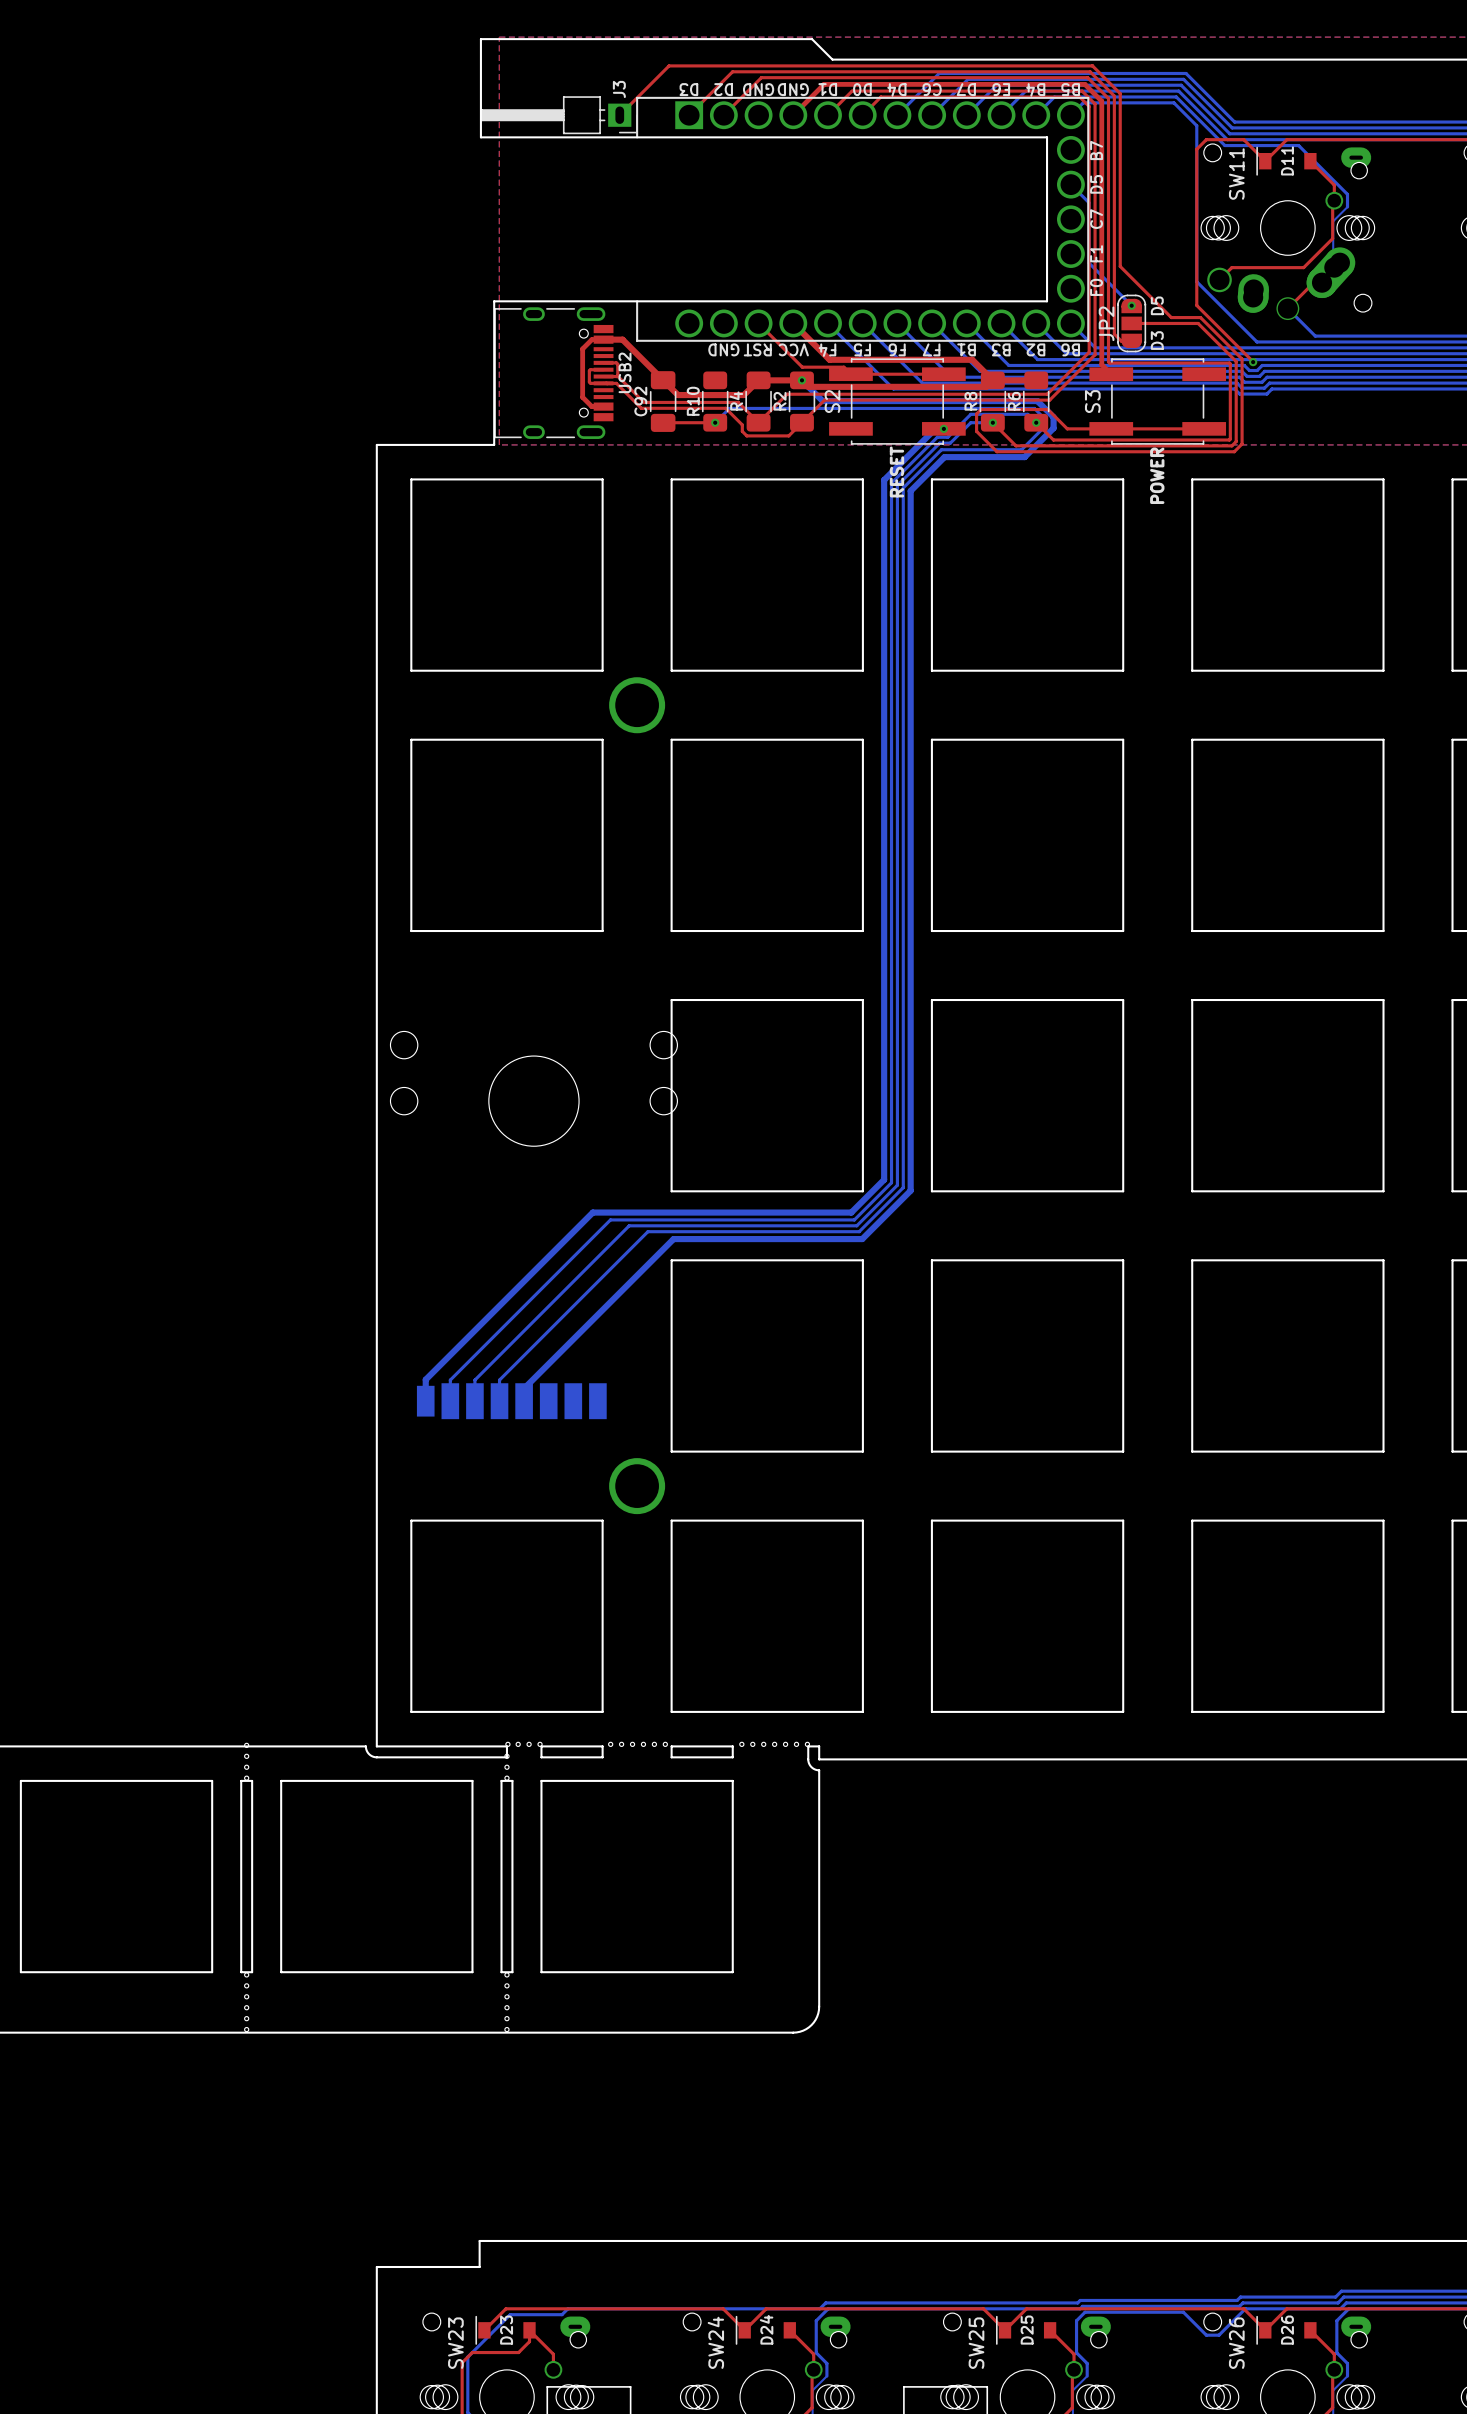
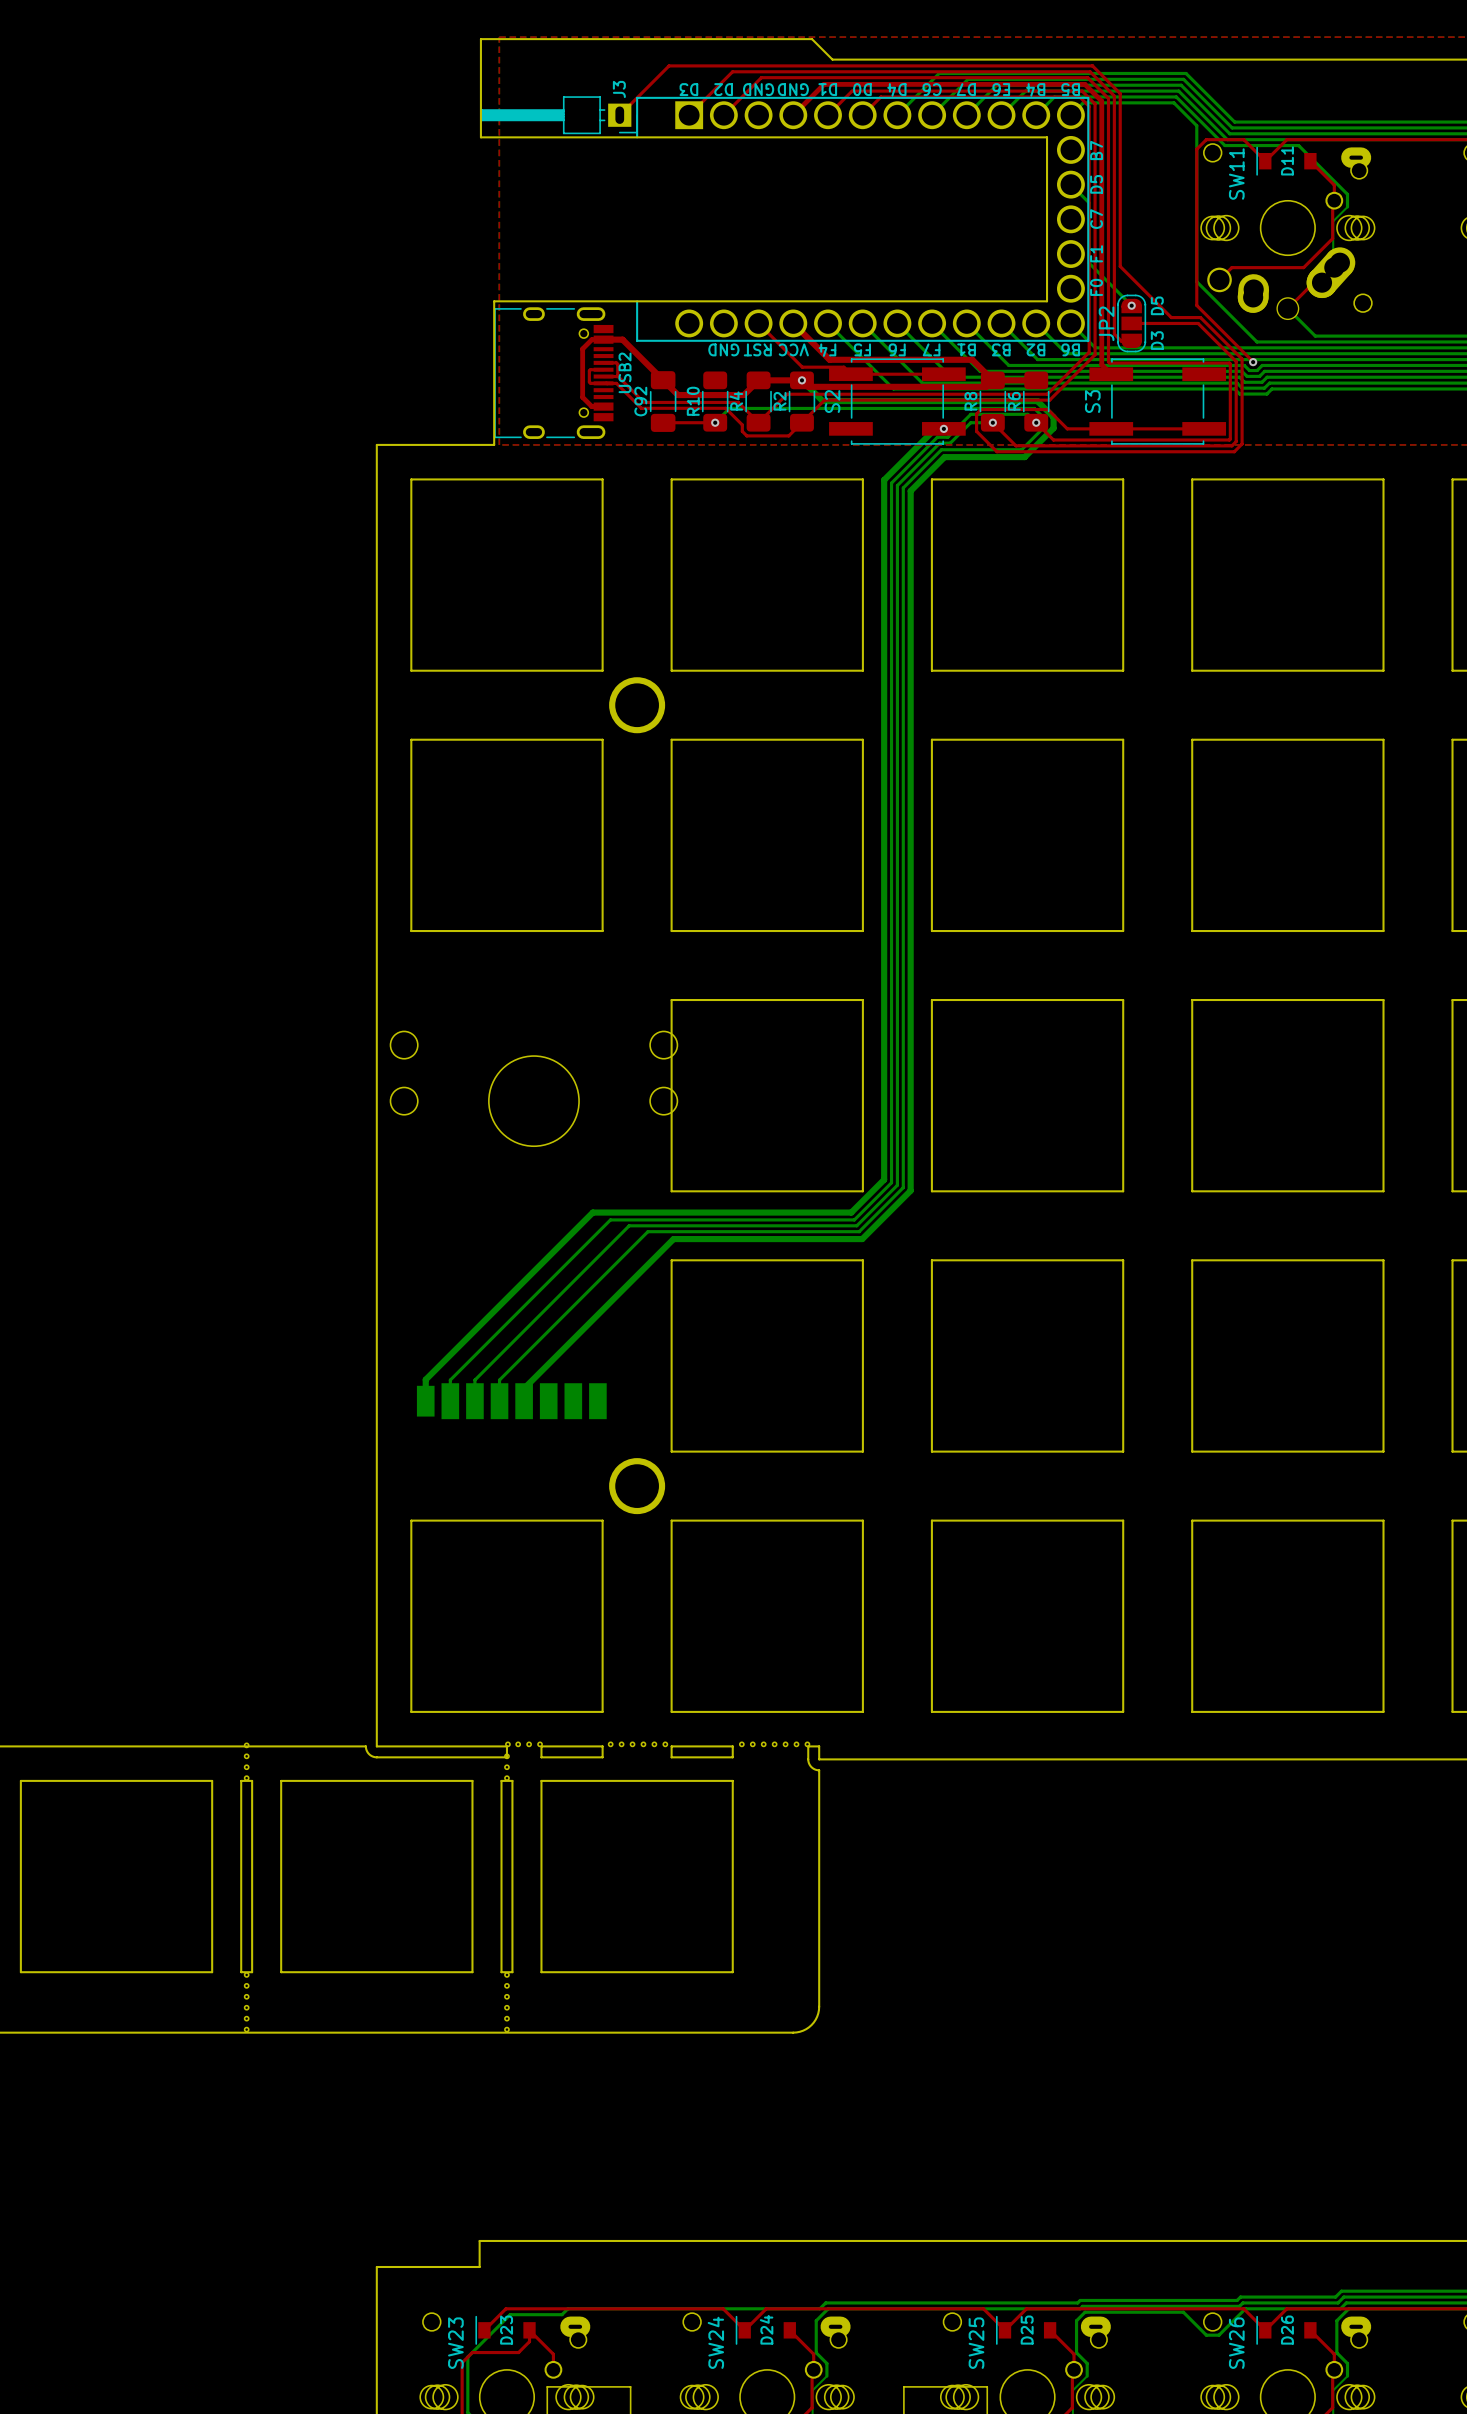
text: RESET (896, 471) -> none
text: POWER (1157, 475) -> none

